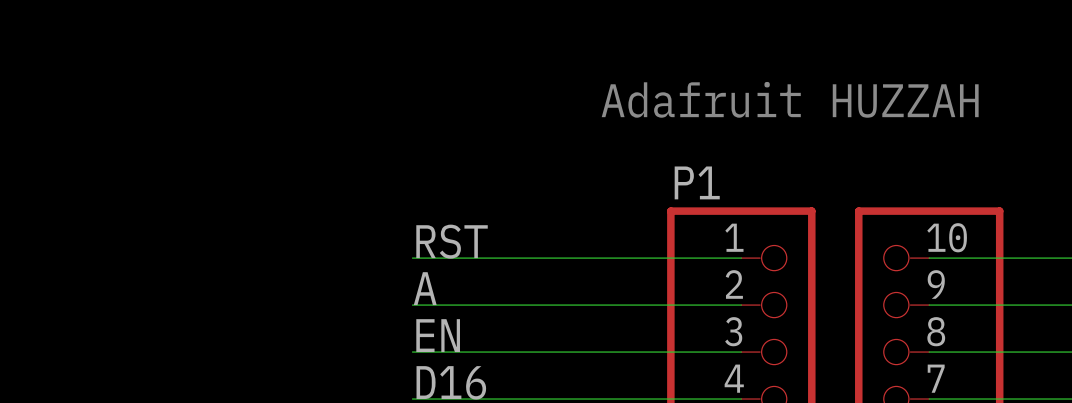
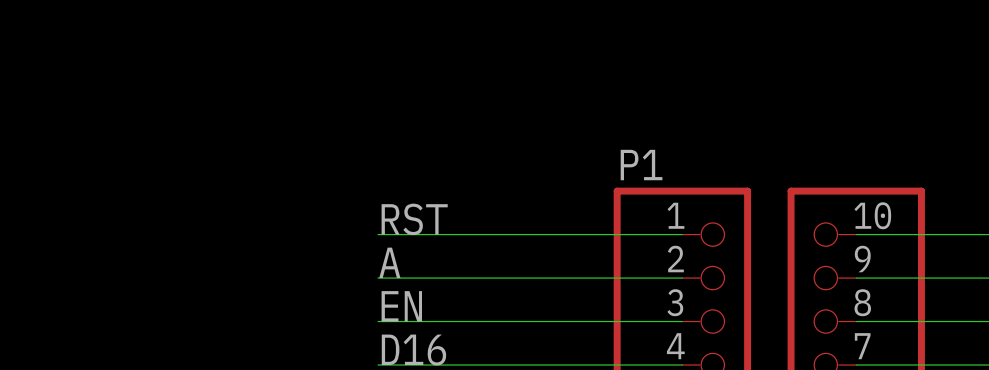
text: Adafruit HUZZAH (790, 99) -> none

